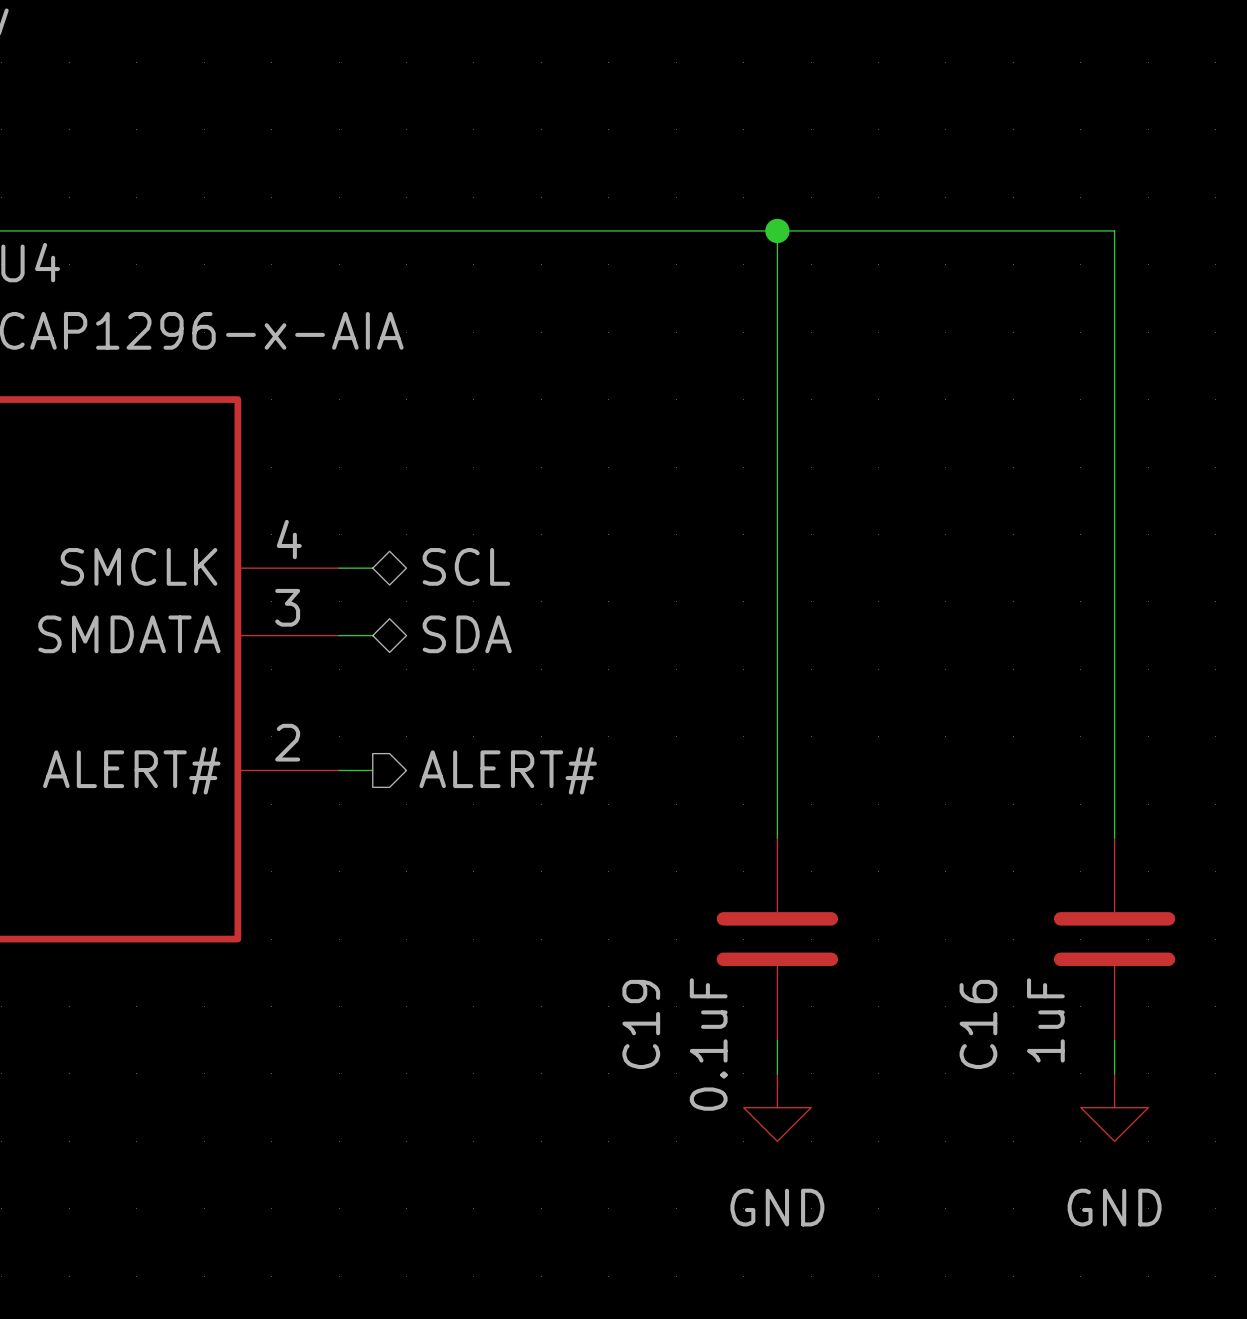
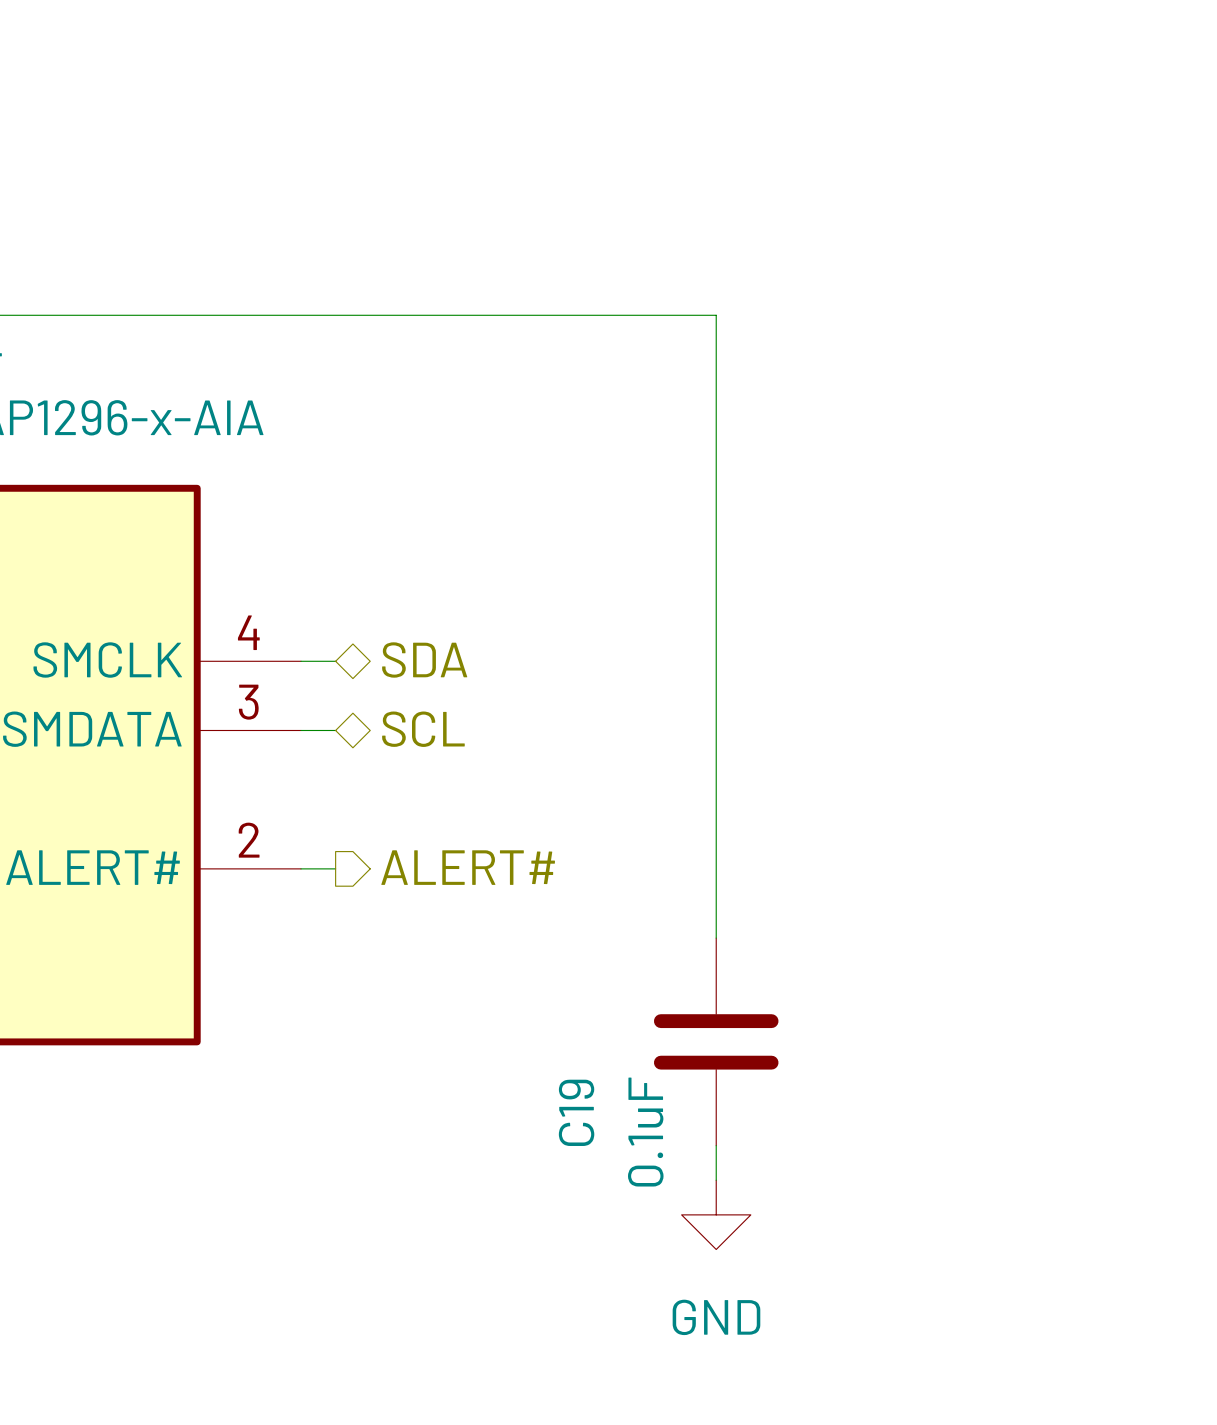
wire: (743, 230) (1114, 230) (1114, 837) -> (716, 315) (716, 938)
wire: (777, 230) (777, 837) -> none
junction: (777, 230) -> none
hierarchical label: SCL (466, 566) -> SDA (424, 659)
hierarchical label: SDA (467, 634) -> SCL (423, 729)
C19 position: (777, 939) -> (716, 1041)
C16: 1uF (1114, 939) -> none
wire: (777, 1040) (777, 1073) -> (716, 1145) (716, 1180)
wire: (1114, 1040) (1114, 1073) -> none
power symbol position: GND (777, 1107) -> GND (716, 1214)
power symbol: GND (1114, 1107) -> none

